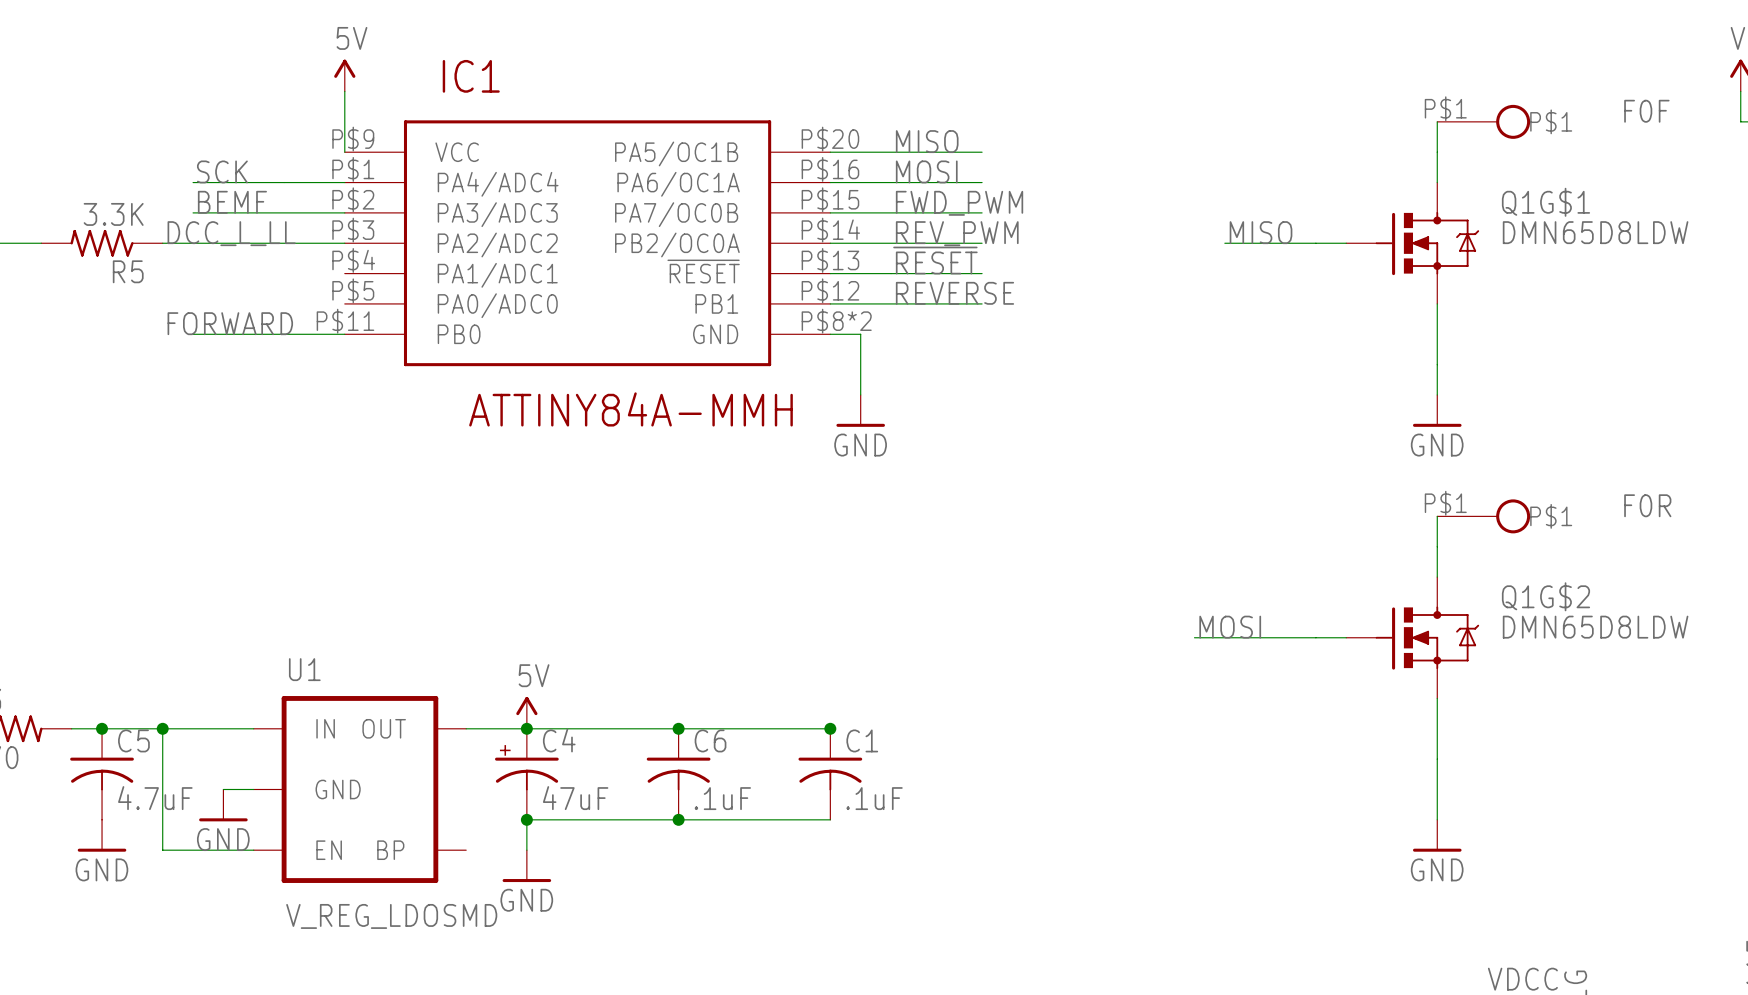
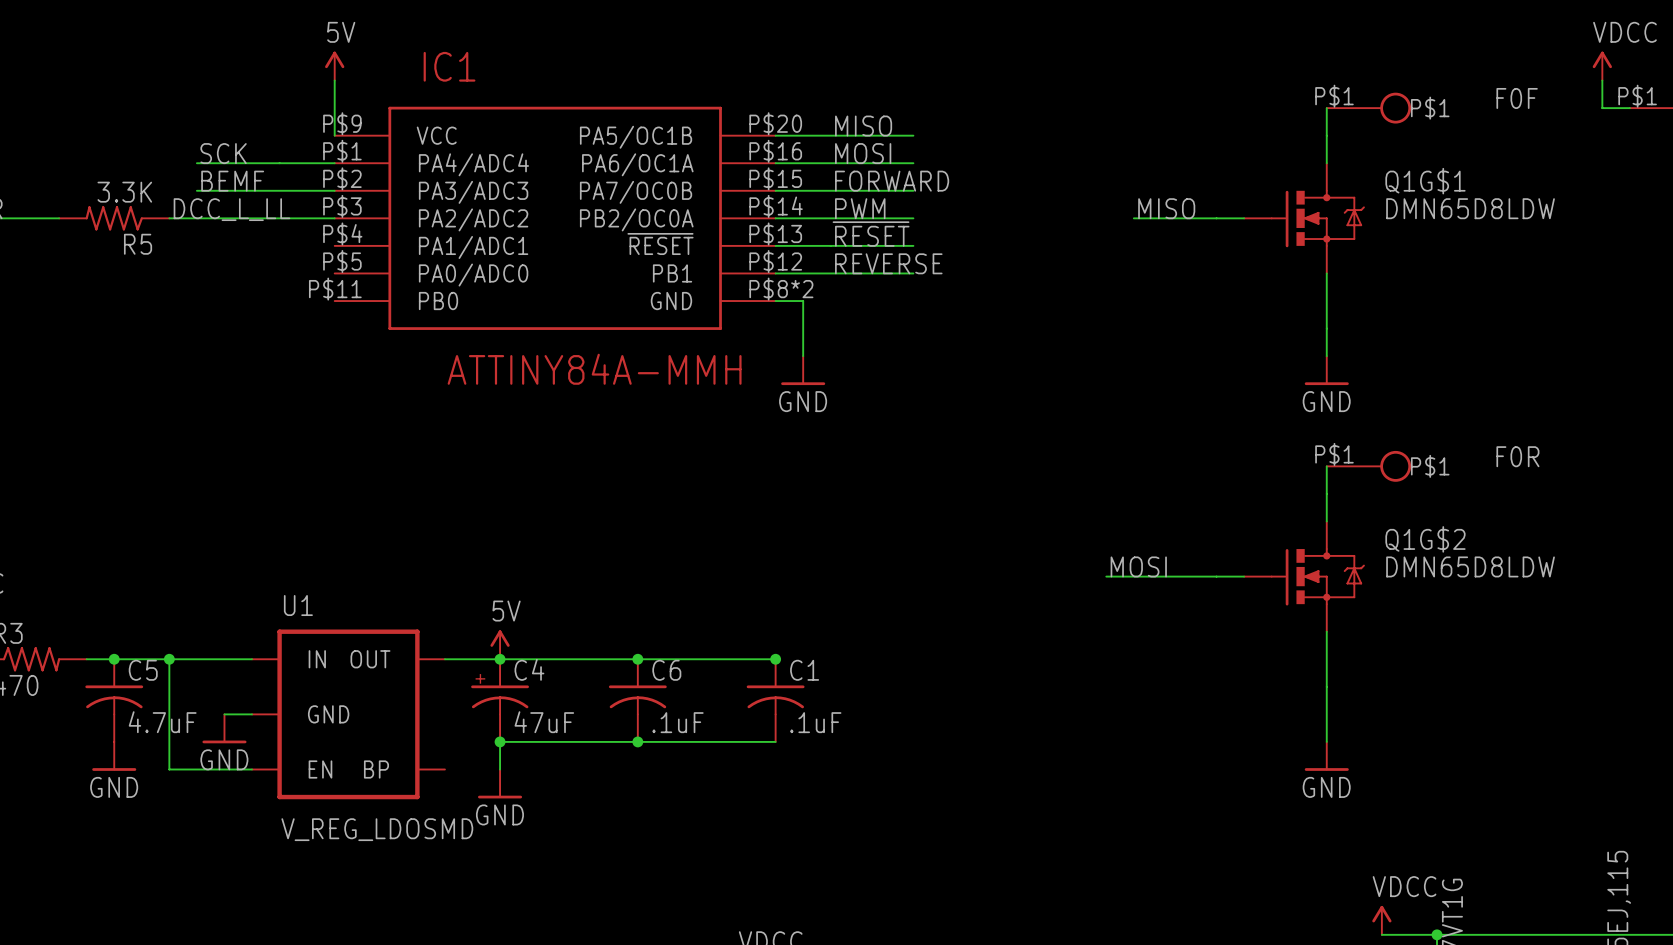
label: FWD_PWM (959, 203) -> FORWARD (892, 181)
label: REV_PWM (957, 233) -> PWM (860, 208)
label: FORWARD (230, 323) -> none
wire: (193, 334) (344, 334) -> none

